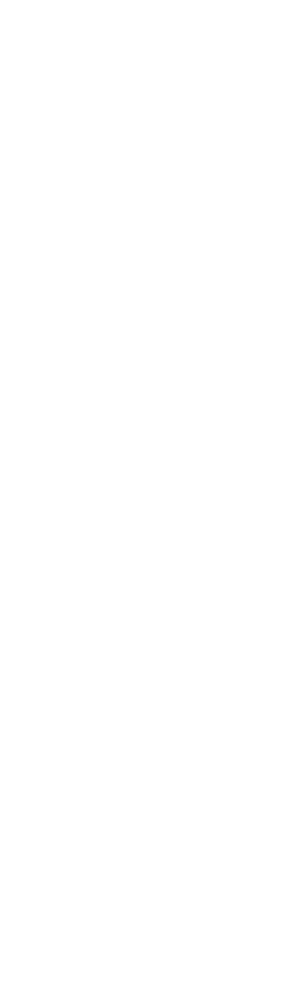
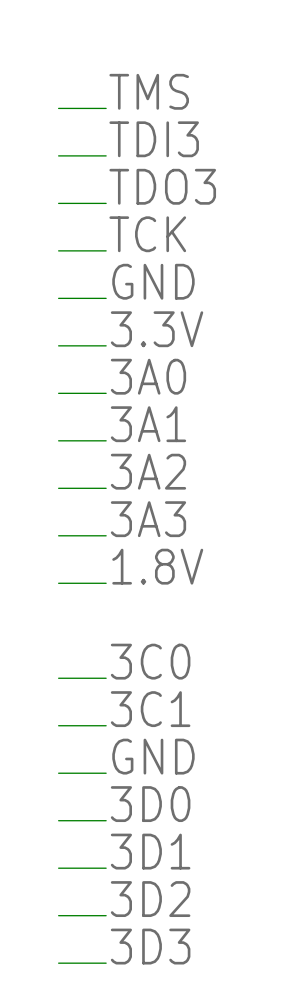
label: none -> TMS (149, 91)
wire: none -> (58, 108) (106, 108)
label: none -> TDI3 (154, 139)
wire: none -> (58, 155) (106, 155)
label: none -> TDO3 (162, 186)
wire: none -> (58, 203) (106, 203)
label: none -> TCK (147, 234)
wire: none -> (58, 250) (106, 250)
label: none -> GND (153, 281)
wire: none -> (58, 298) (106, 298)
label: none -> 3.3V (157, 329)
wire: none -> (58, 345) (106, 345)
label: none -> 3A0 (148, 376)
wire: none -> (58, 393) (106, 393)
label: none -> 3A1 (148, 424)
wire: none -> (58, 440) (106, 440)
label: none -> 3A2 (148, 471)
wire: none -> (58, 488) (106, 488)
label: none -> 3A3 (148, 519)
wire: none -> (58, 535) (106, 535)
label: none -> 1.8V (157, 566)
wire: none -> (58, 583) (106, 583)
label: none -> 3C0 (150, 661)
wire: none -> (58, 678) (106, 678)
label: none -> 3C1 (150, 709)
wire: none -> (58, 725) (106, 725)
label: none -> GND (153, 756)
wire: none -> (58, 773) (106, 773)
label: none -> 3D0 (150, 804)
wire: none -> (58, 820) (106, 820)
label: none -> 3D1 (150, 851)
wire: none -> (58, 868) (106, 868)
label: none -> 3D2 (150, 899)
wire: none -> (58, 915) (106, 915)
label: none -> 3D3 (150, 946)
wire: none -> (58, 963) (106, 963)

